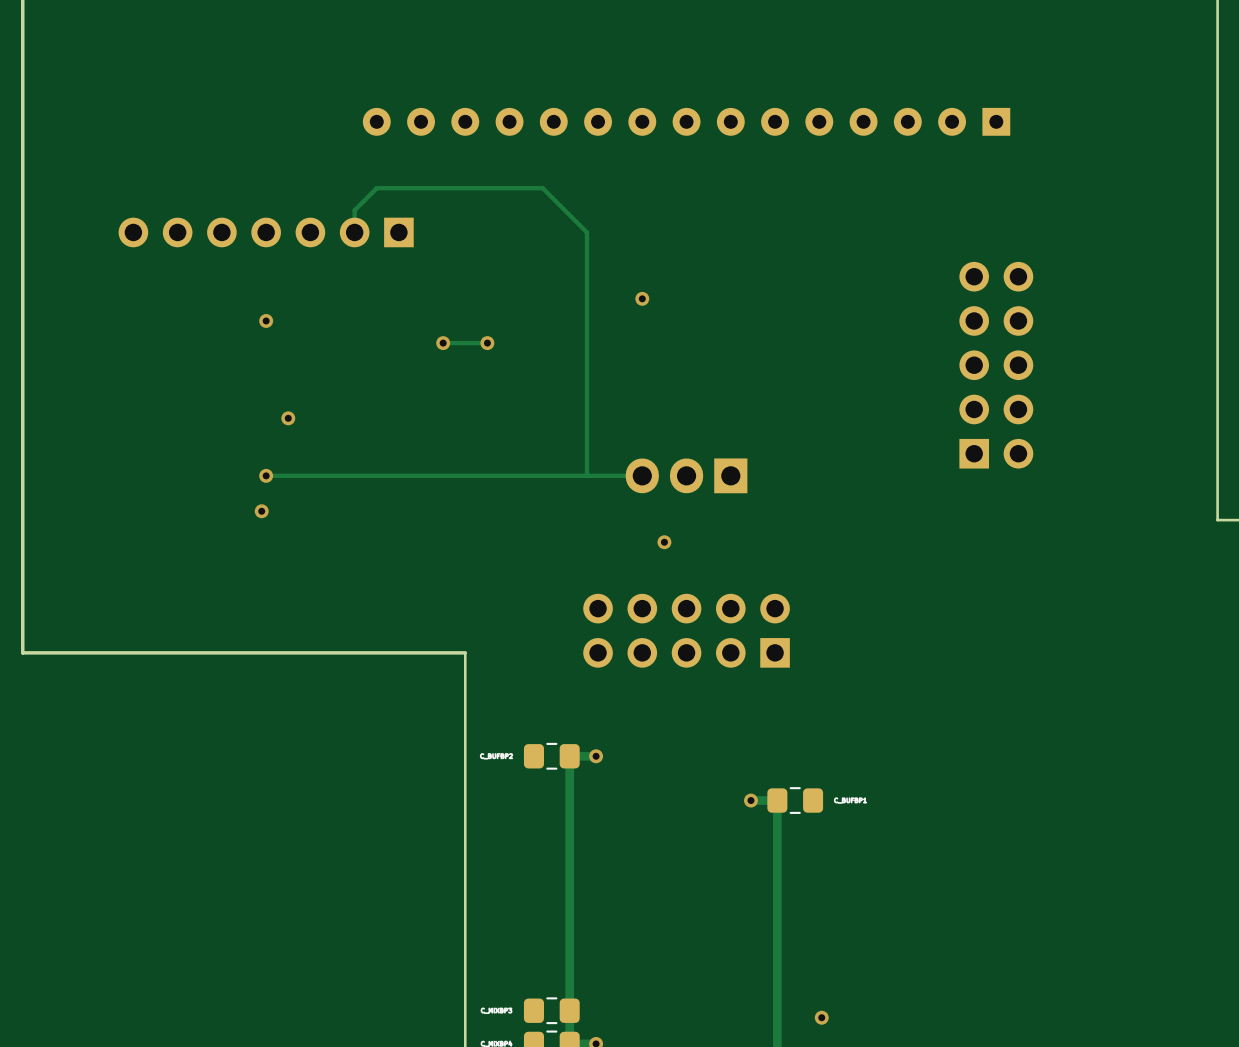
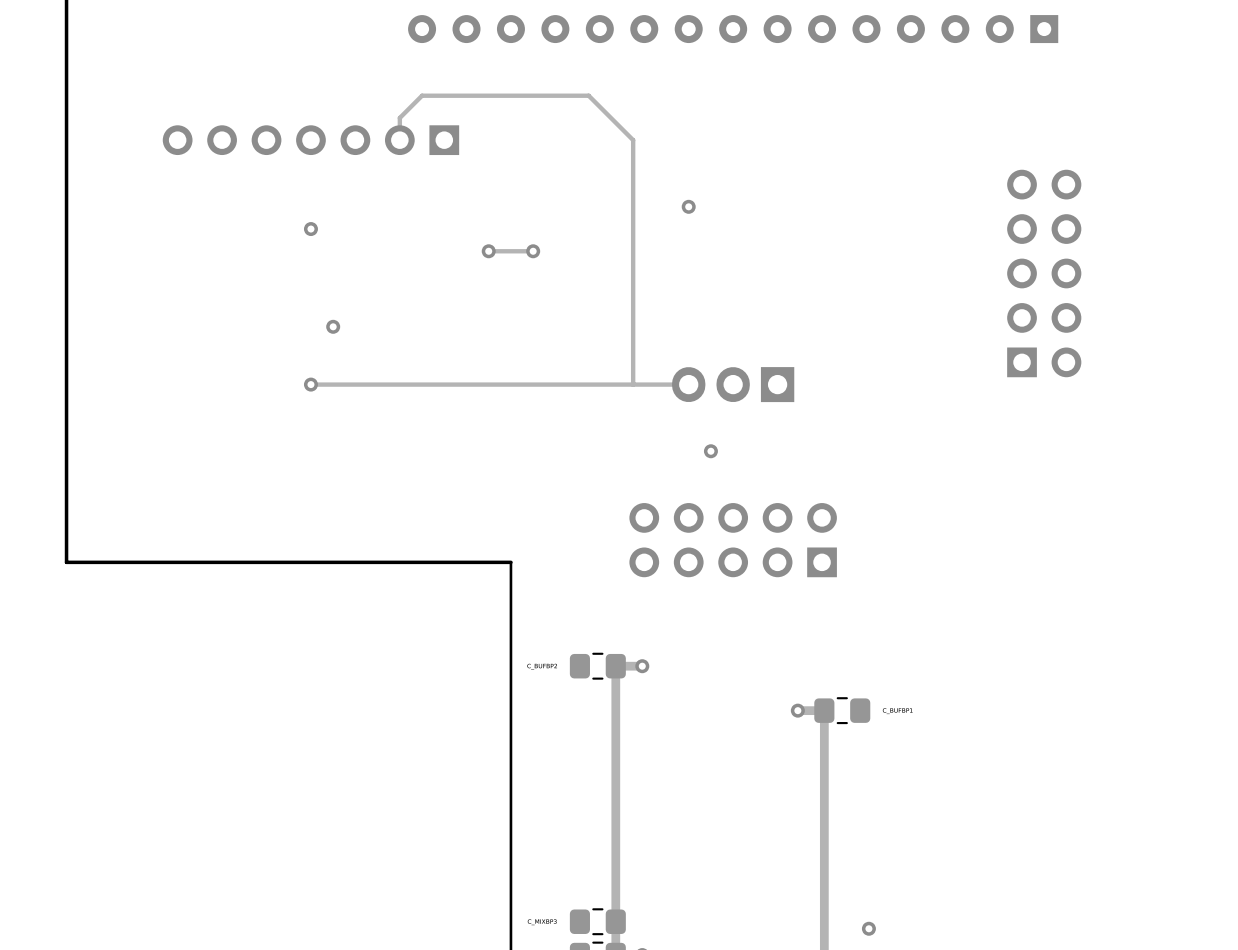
via: (261, 511) -> none

